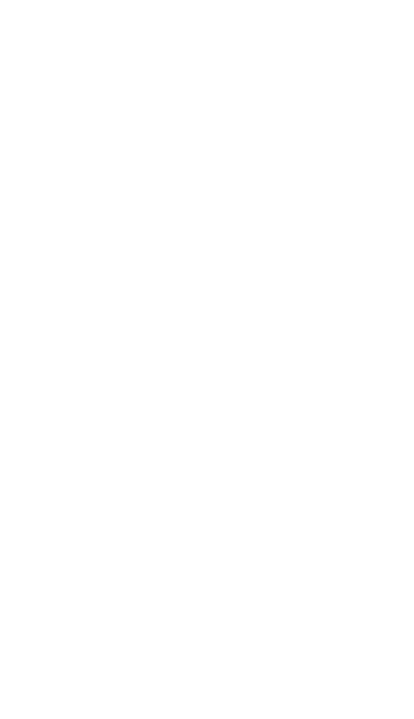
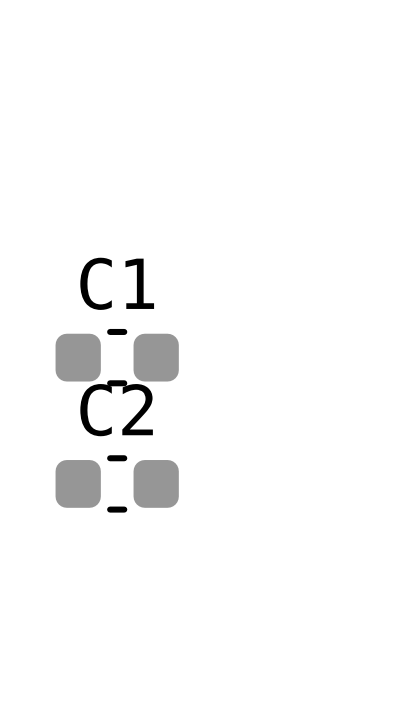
C1: none -> (117, 357)
C2: none -> (117, 483)

